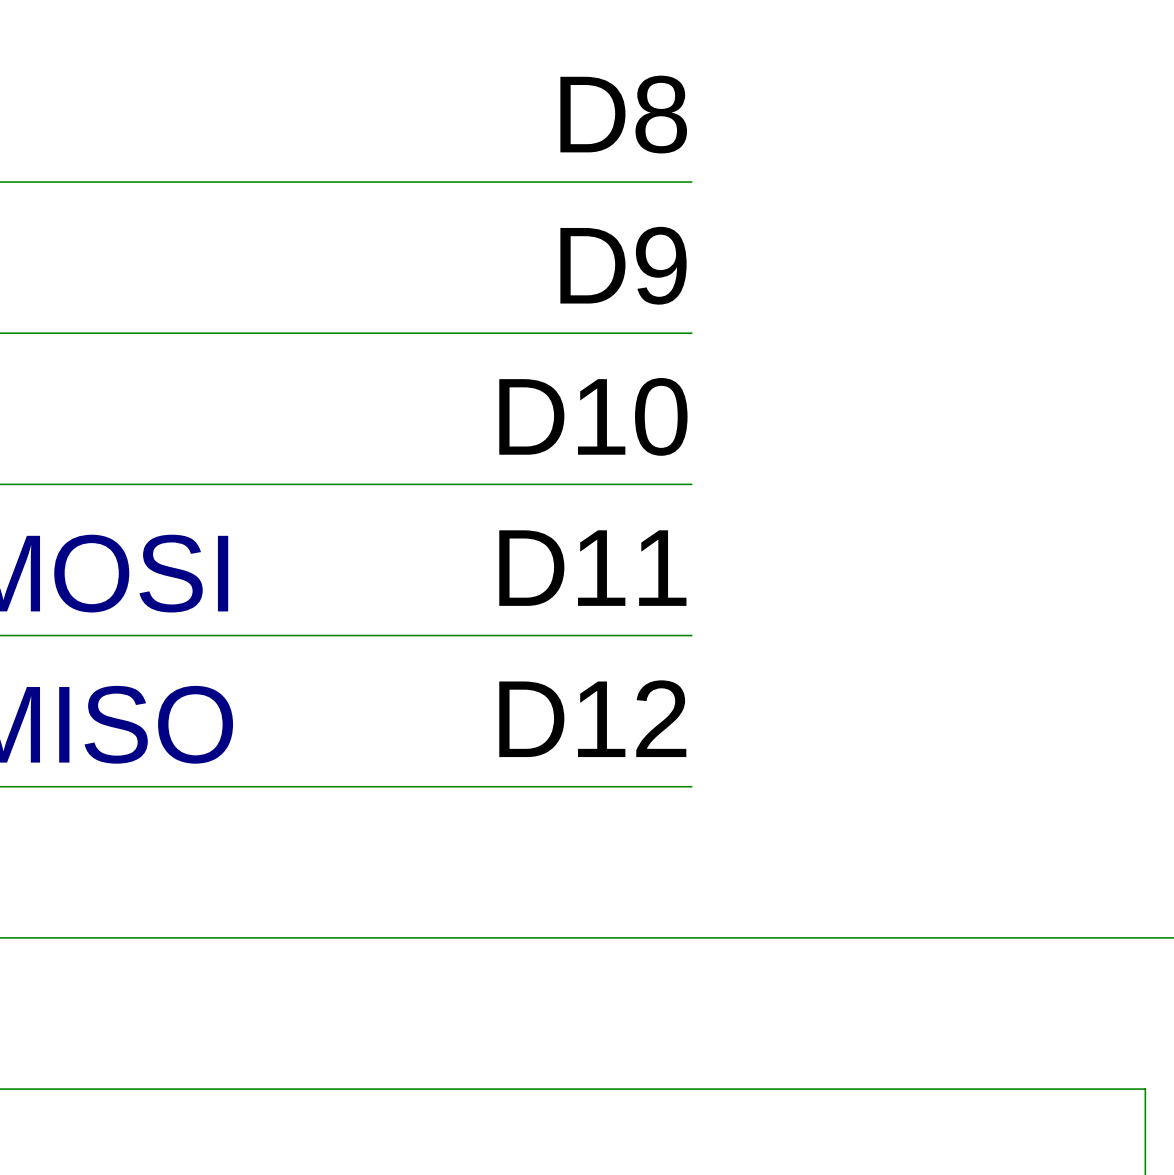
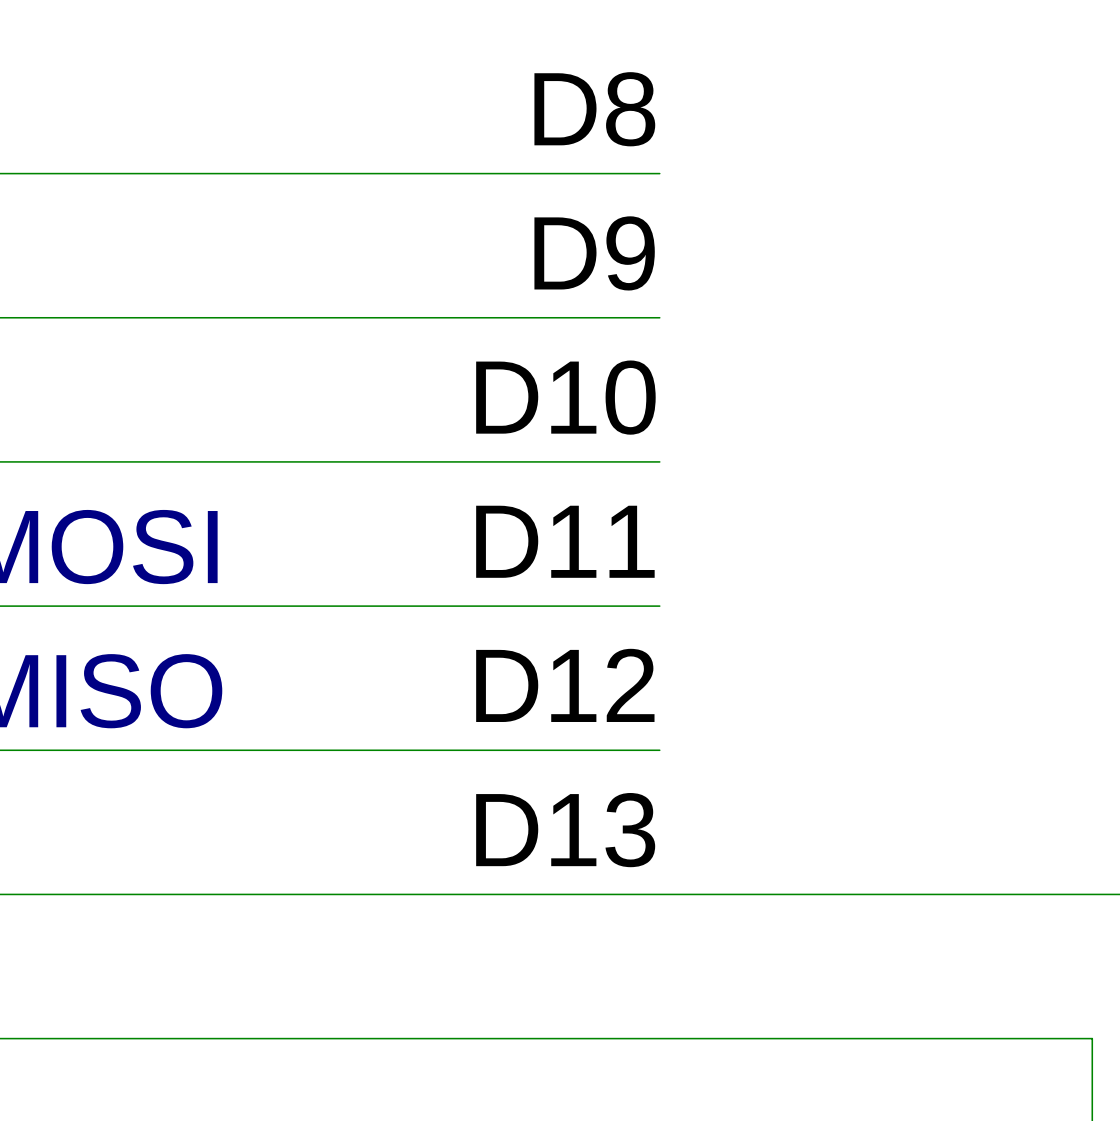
label: none -> D13 (565, 830)

